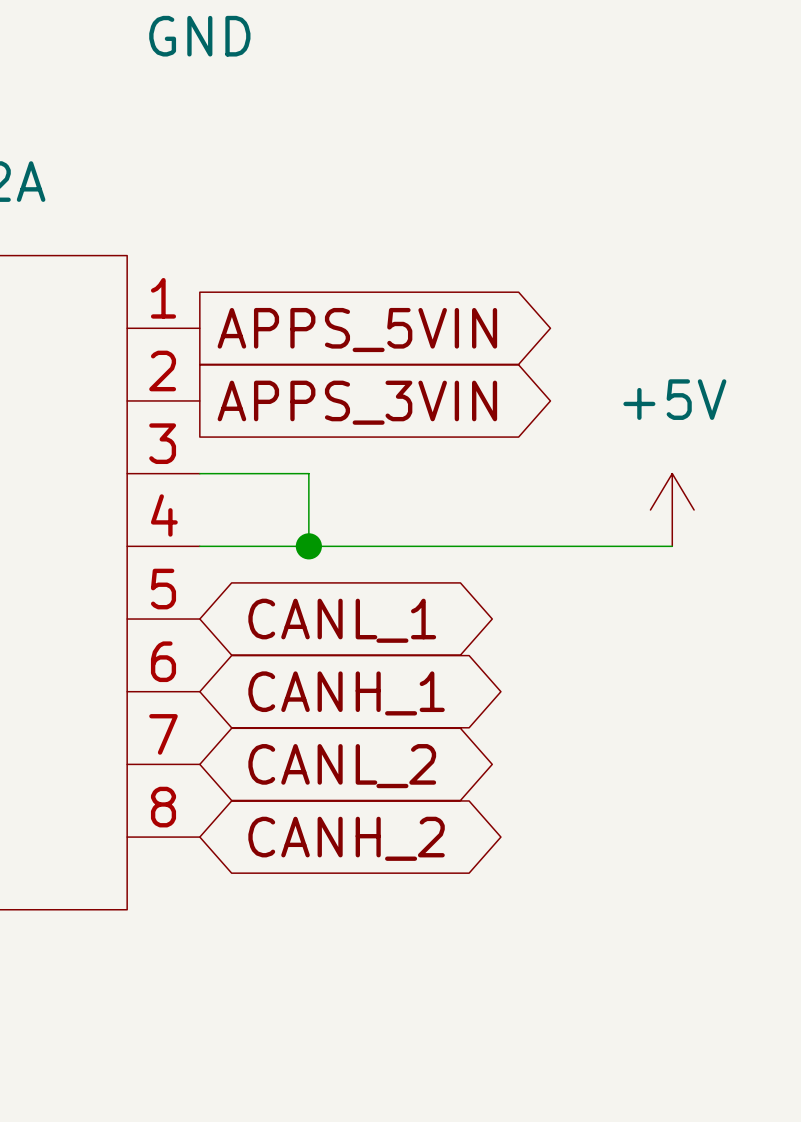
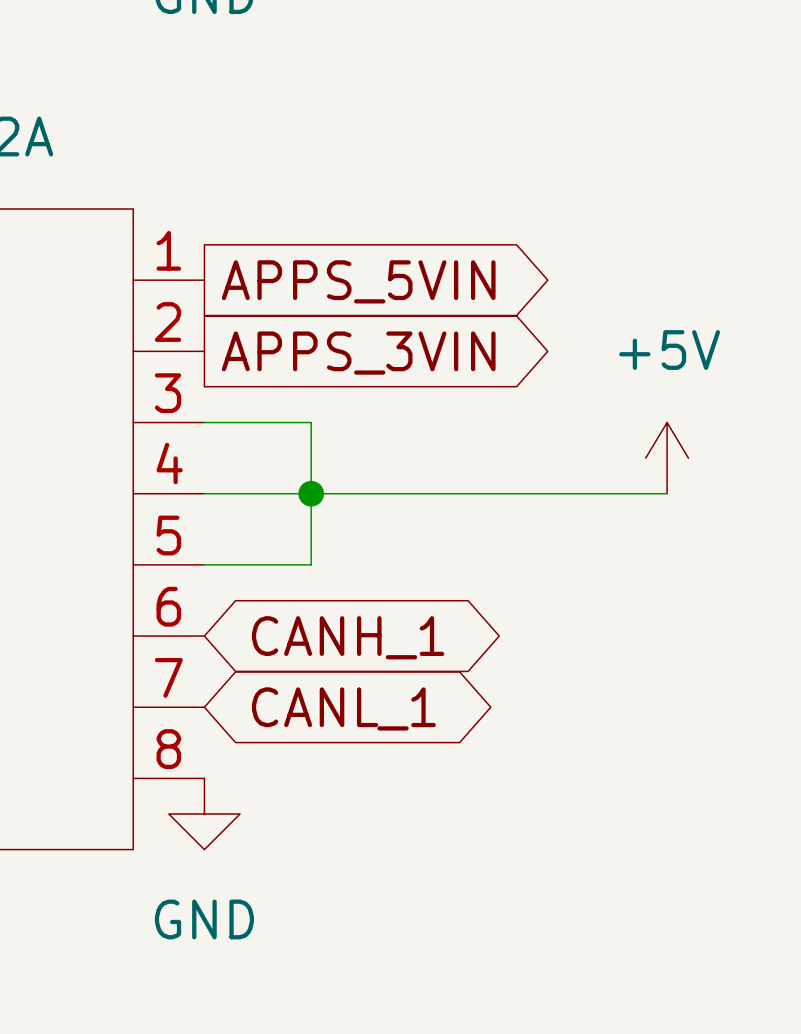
wire: none -> (311, 493) (311, 564) (204, 564)
global label: CANL_1 (342, 620) -> none
global label: CANL_2 (342, 766) -> CANL_1 (343, 708)
global label: CANH_2 (346, 838) -> none
power symbol: none -> GND (204, 814)

